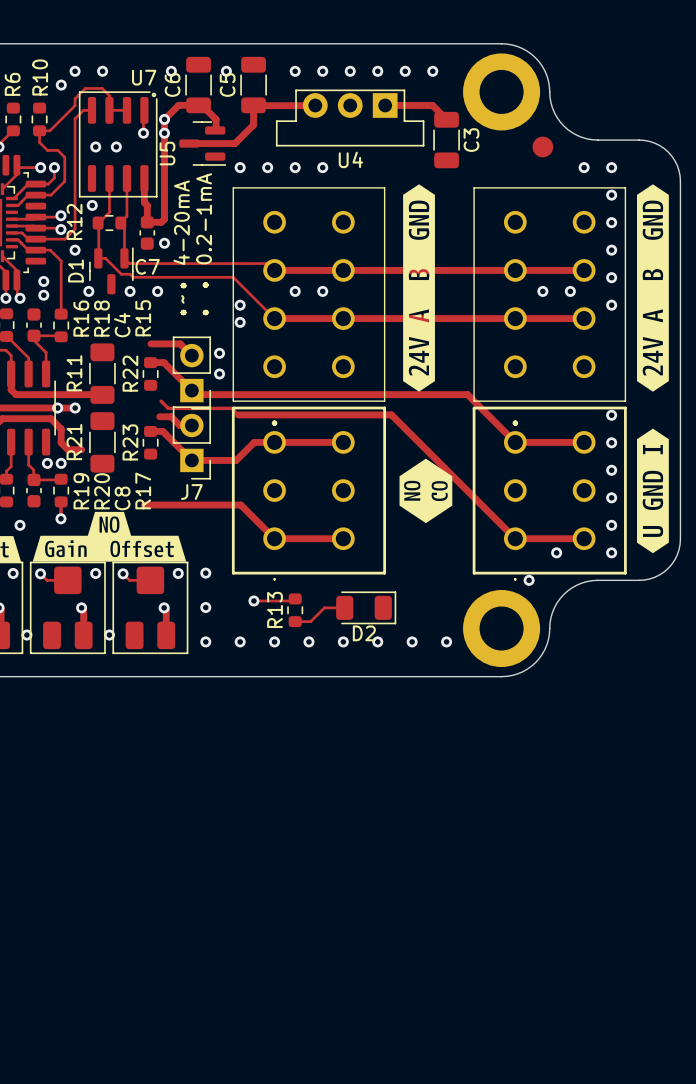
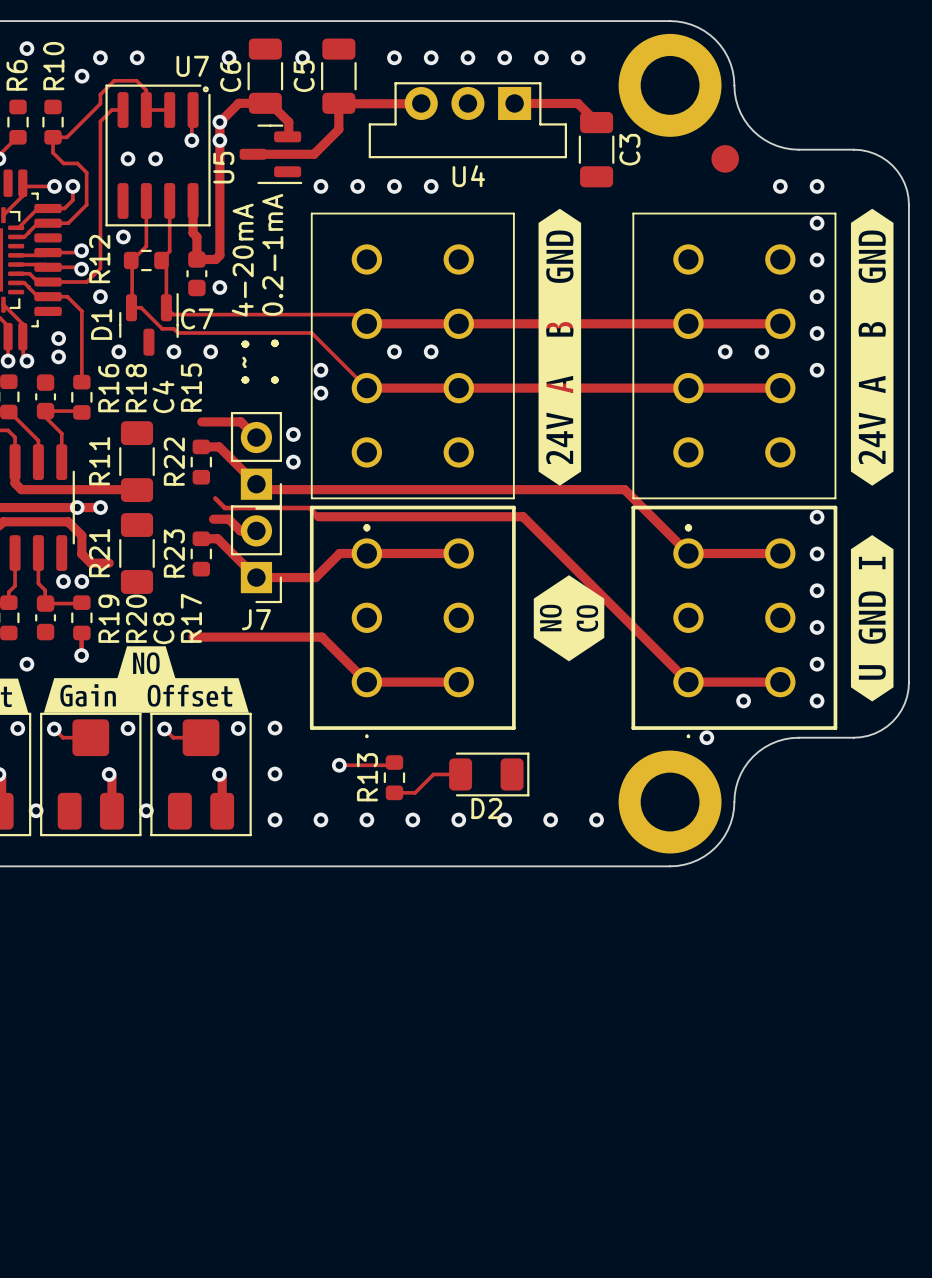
via: none -> (26, 48)

